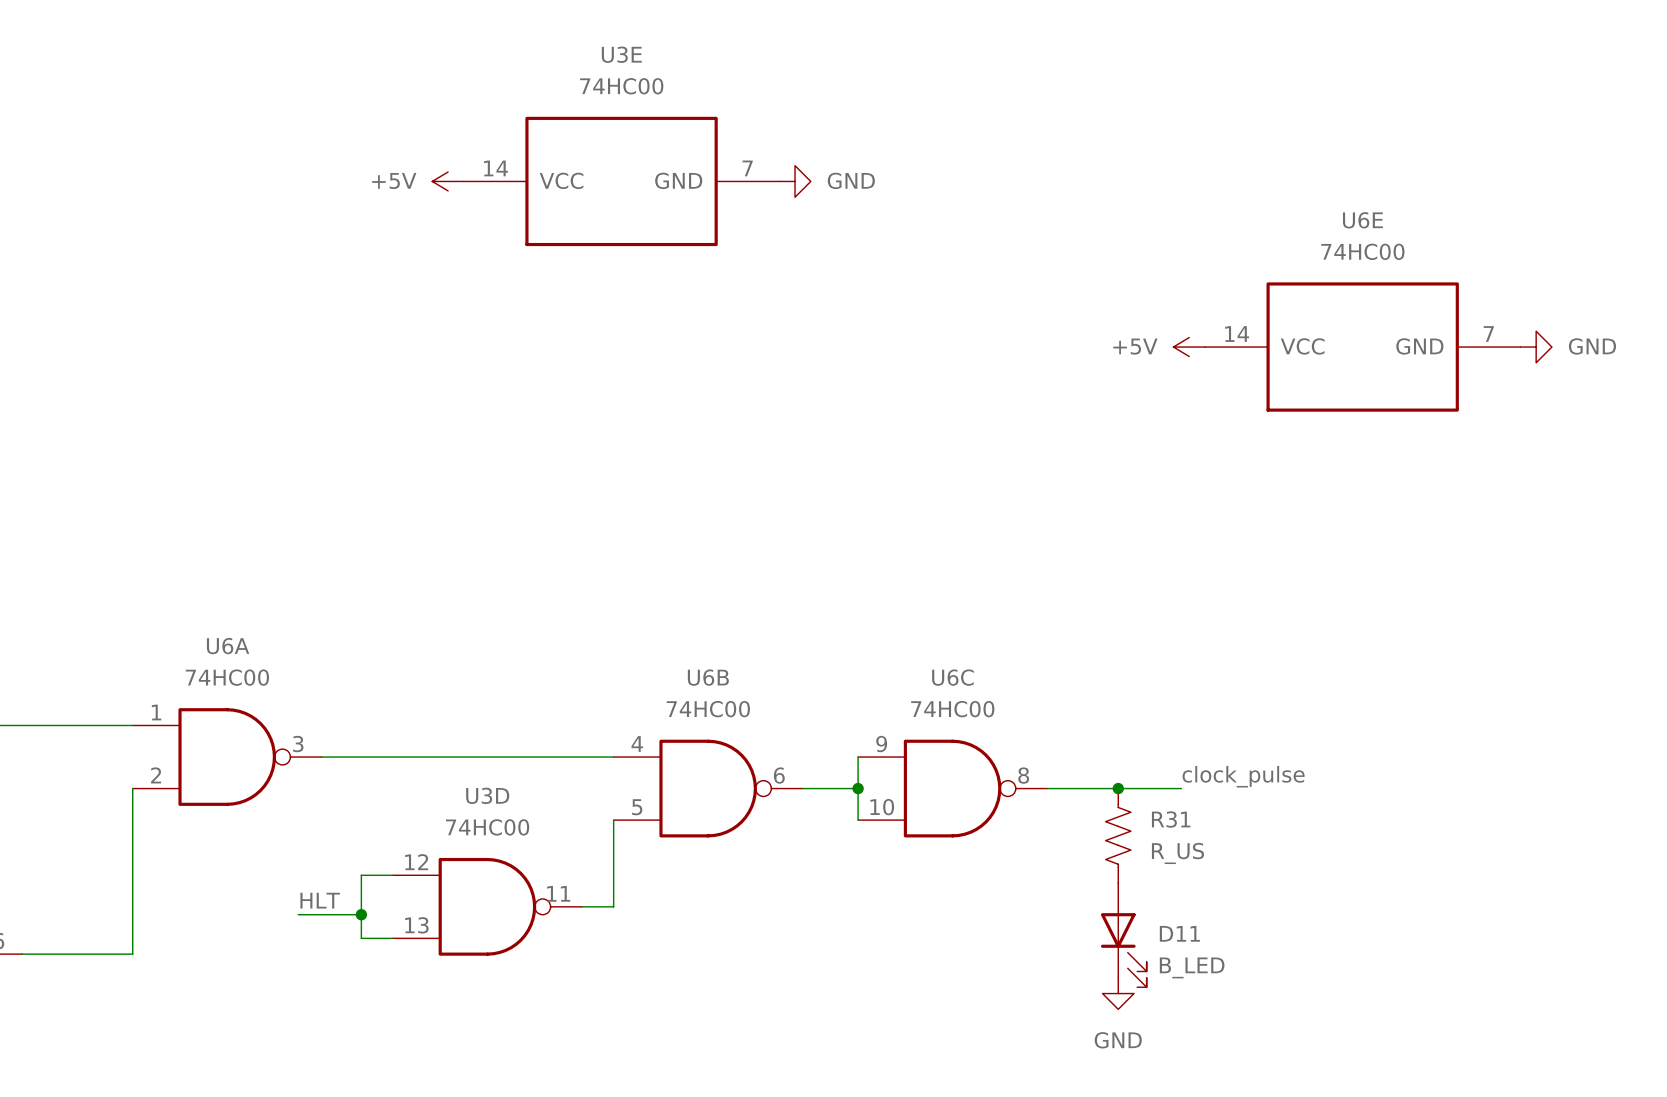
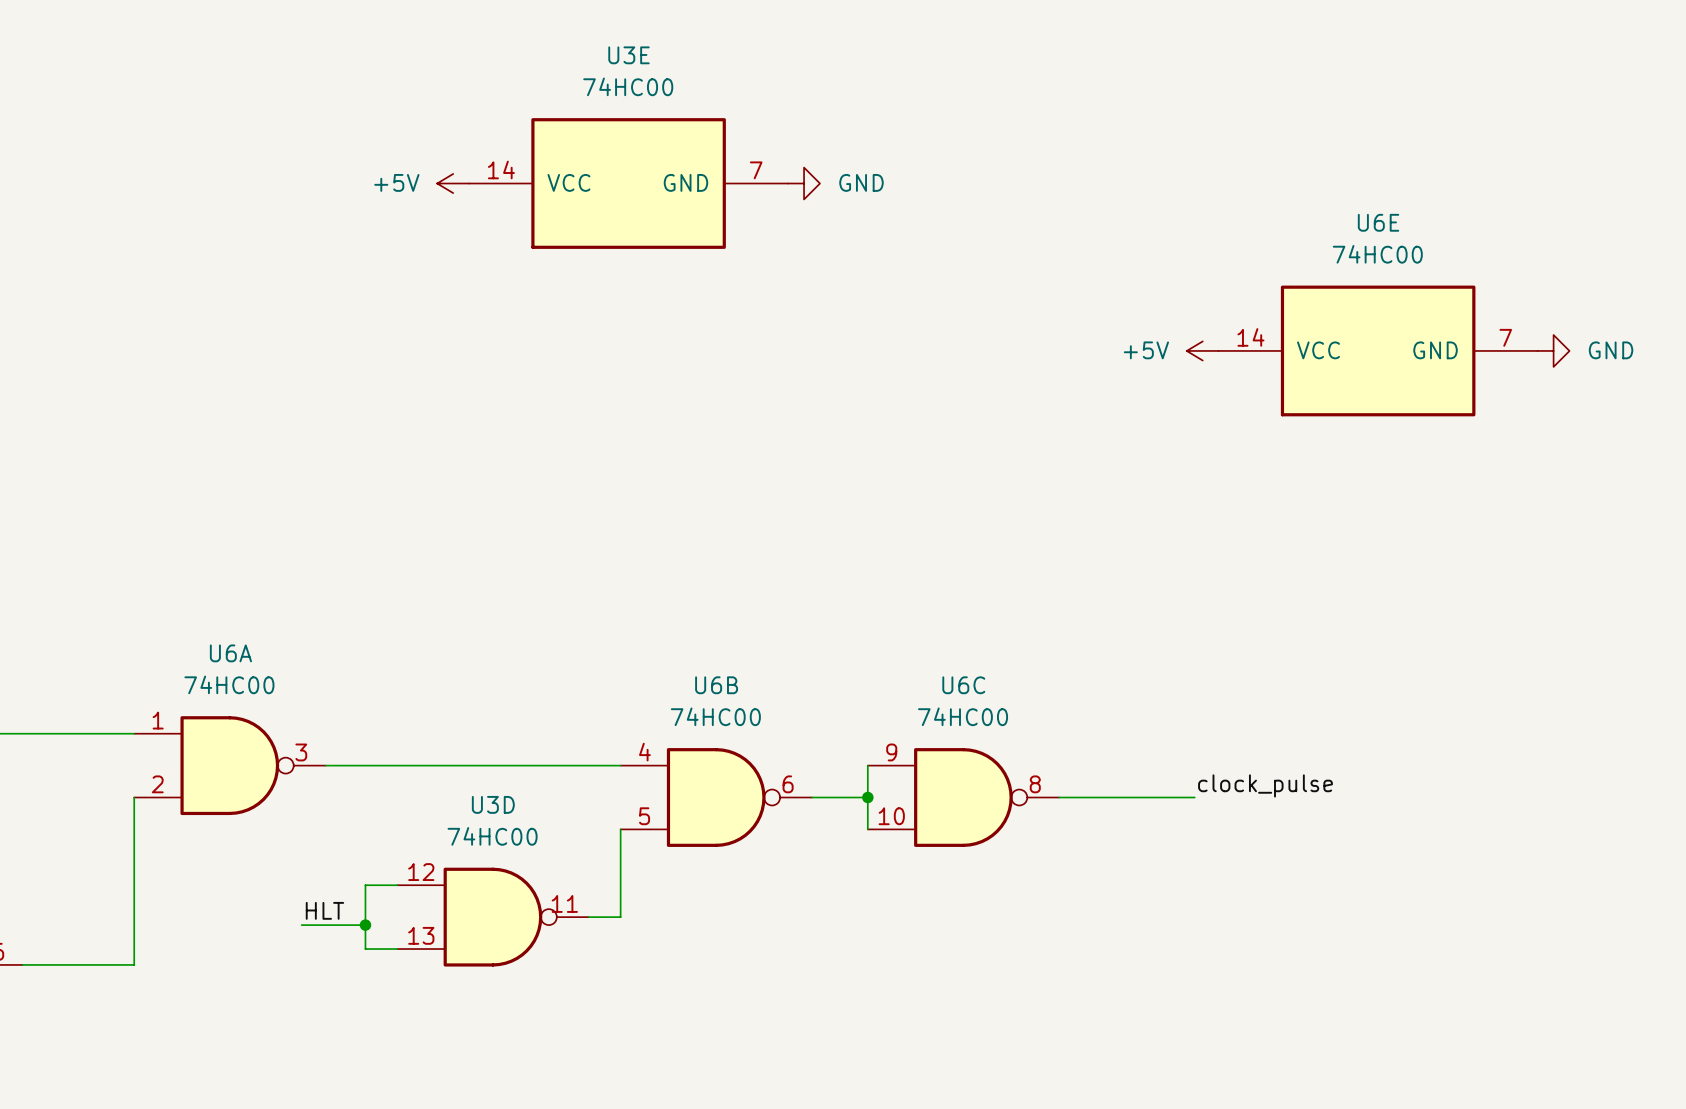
junction: (1118, 788) -> none
R31: R_US (1118, 835) -> none
D11: B_LED (1123, 935) -> none
power symbol: GND (1118, 993) -> none

